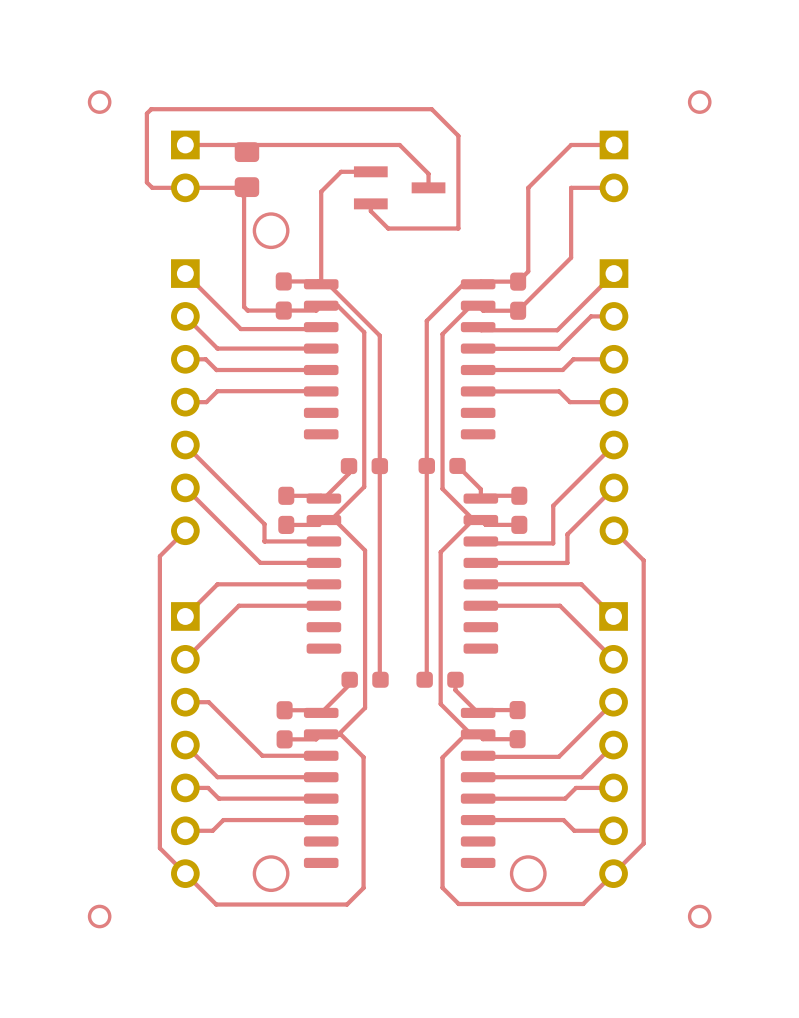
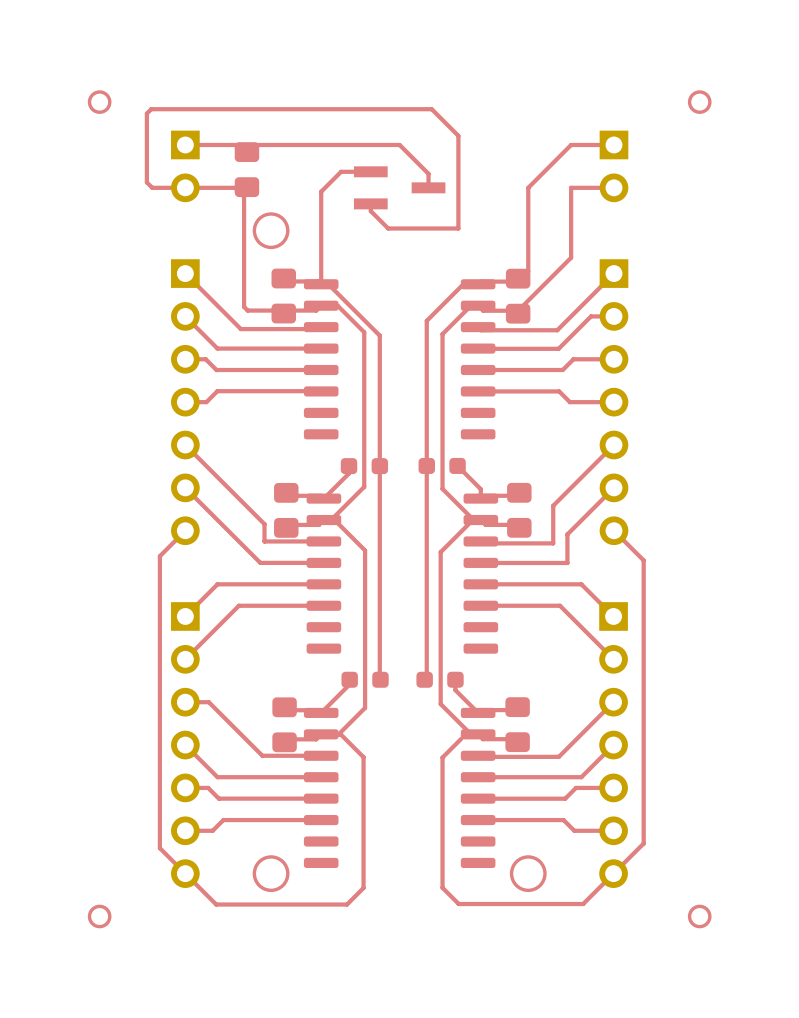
part footprint: [275, 272, 292, 320] -> [271, 268, 296, 324]
part footprint: [510, 272, 527, 320] -> [505, 268, 531, 324]
part footprint: [278, 486, 295, 534] -> [274, 482, 299, 538]
part footprint: [511, 486, 528, 534] -> [507, 482, 532, 538]
part footprint: [276, 701, 293, 749] -> [272, 697, 297, 753]
part footprint: [509, 701, 526, 749] -> [505, 697, 530, 753]

